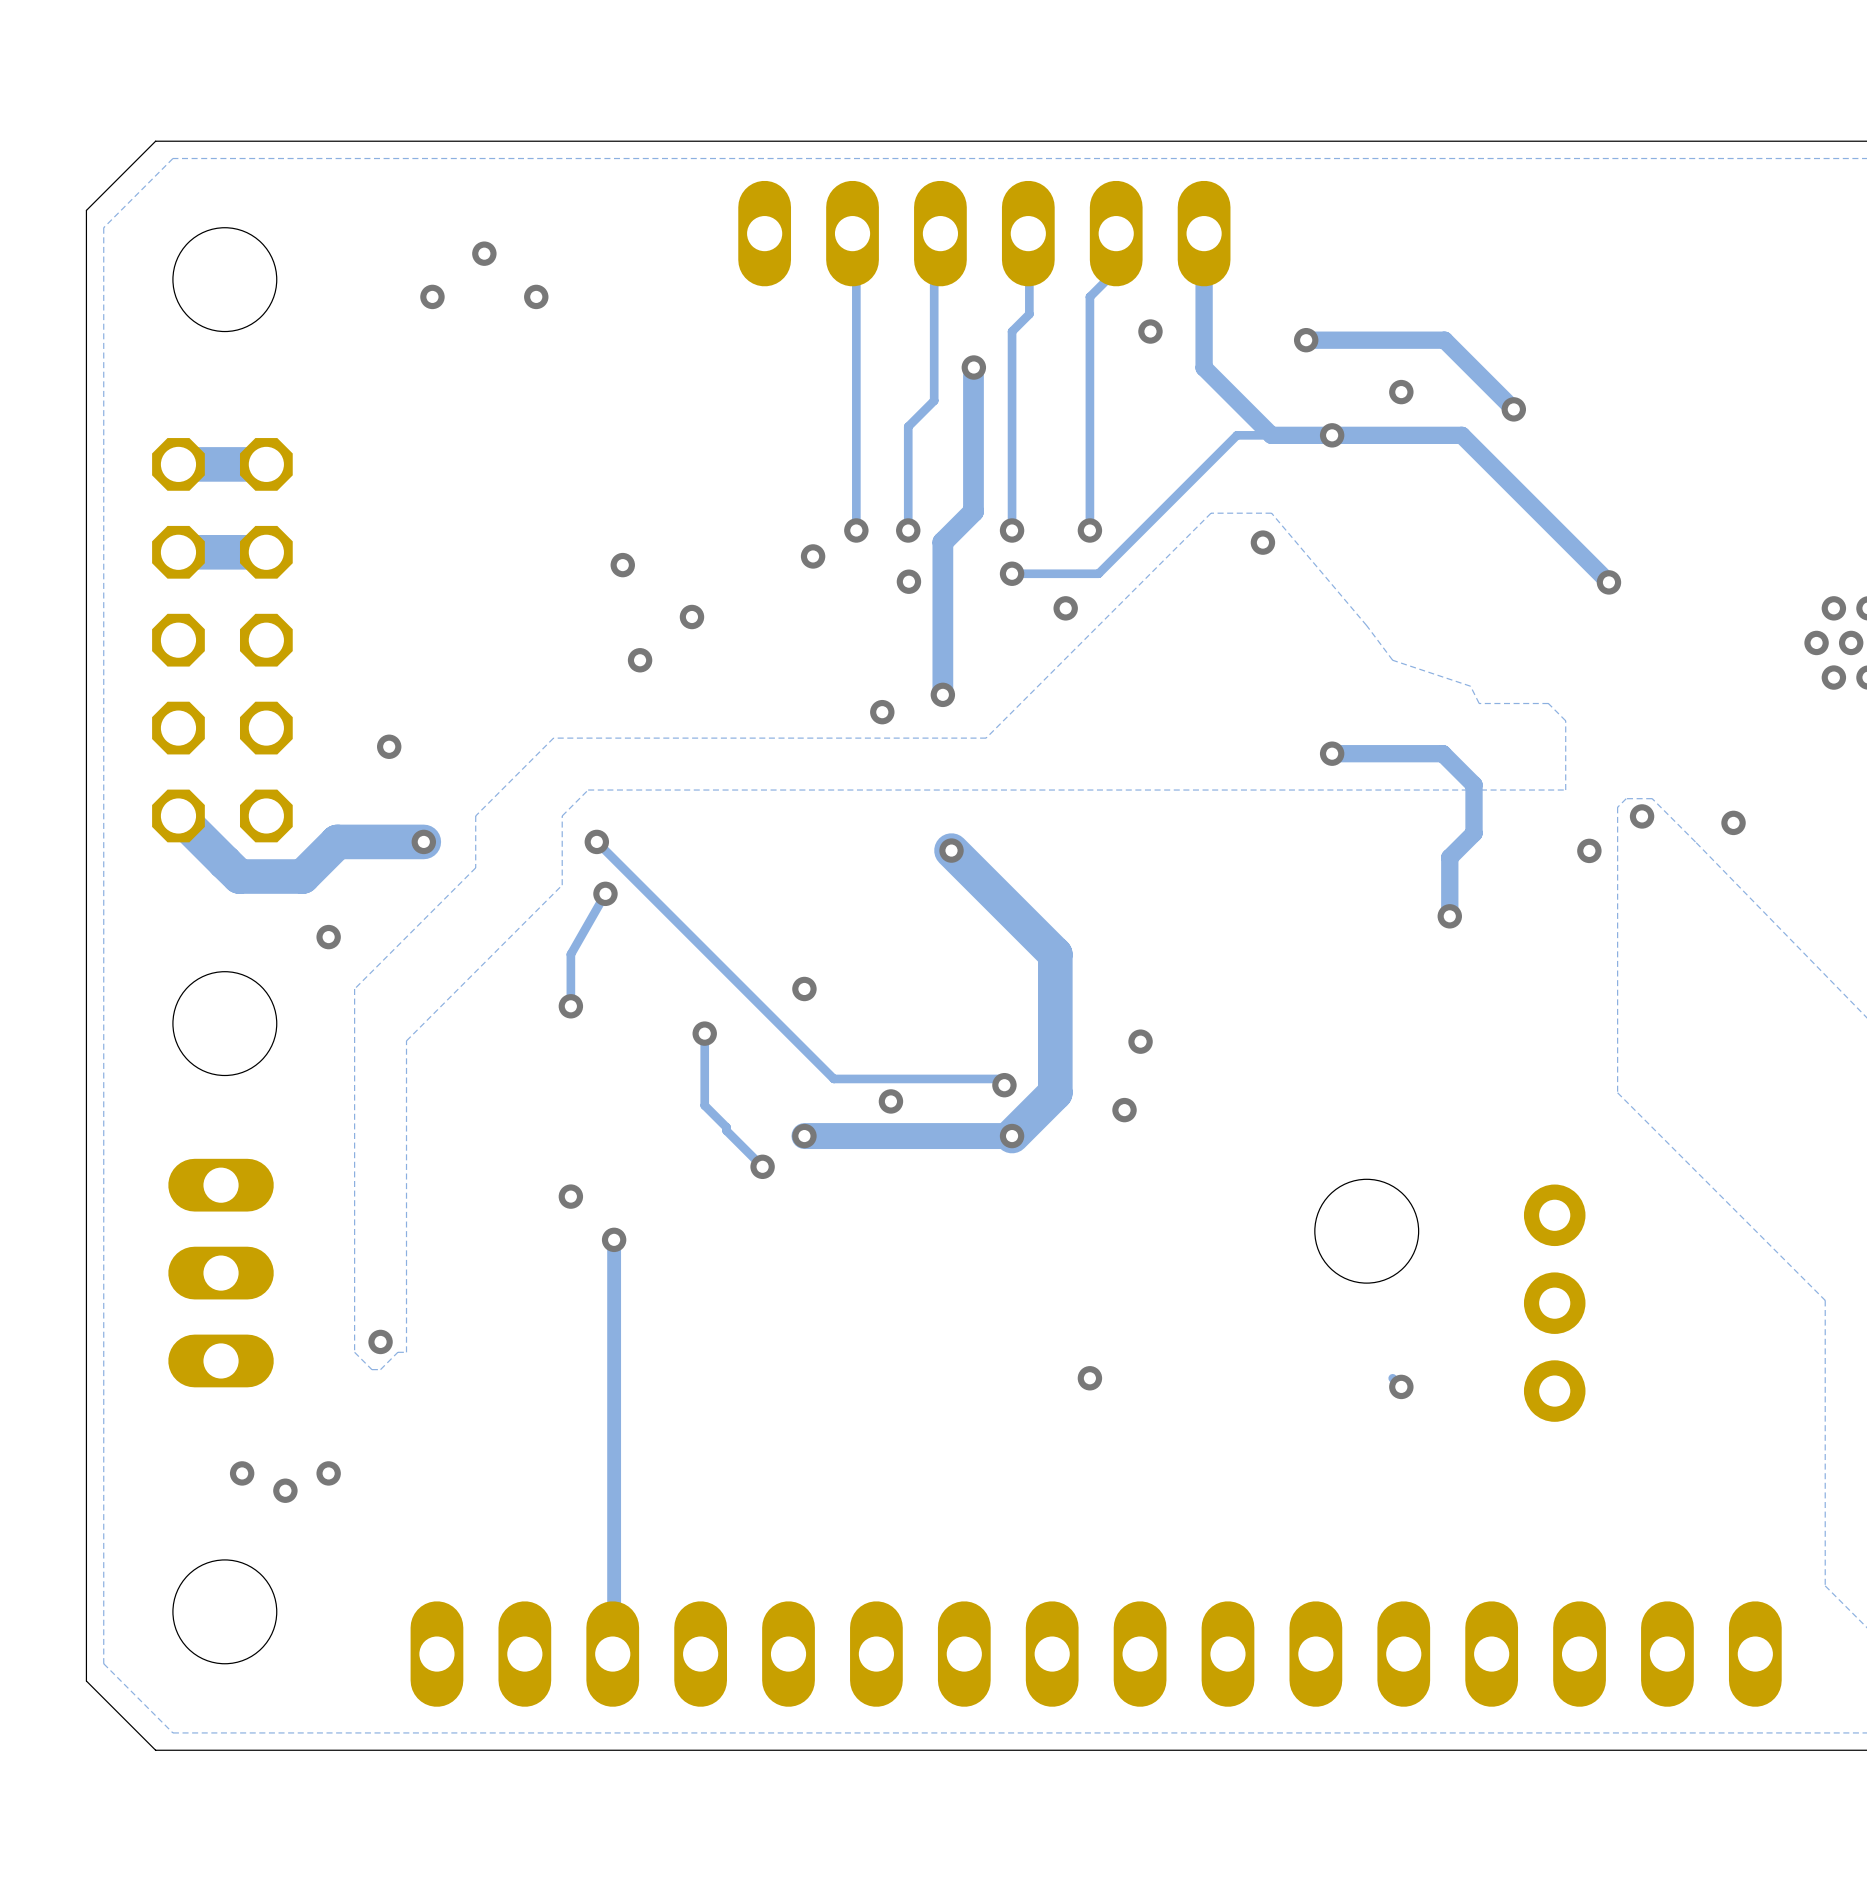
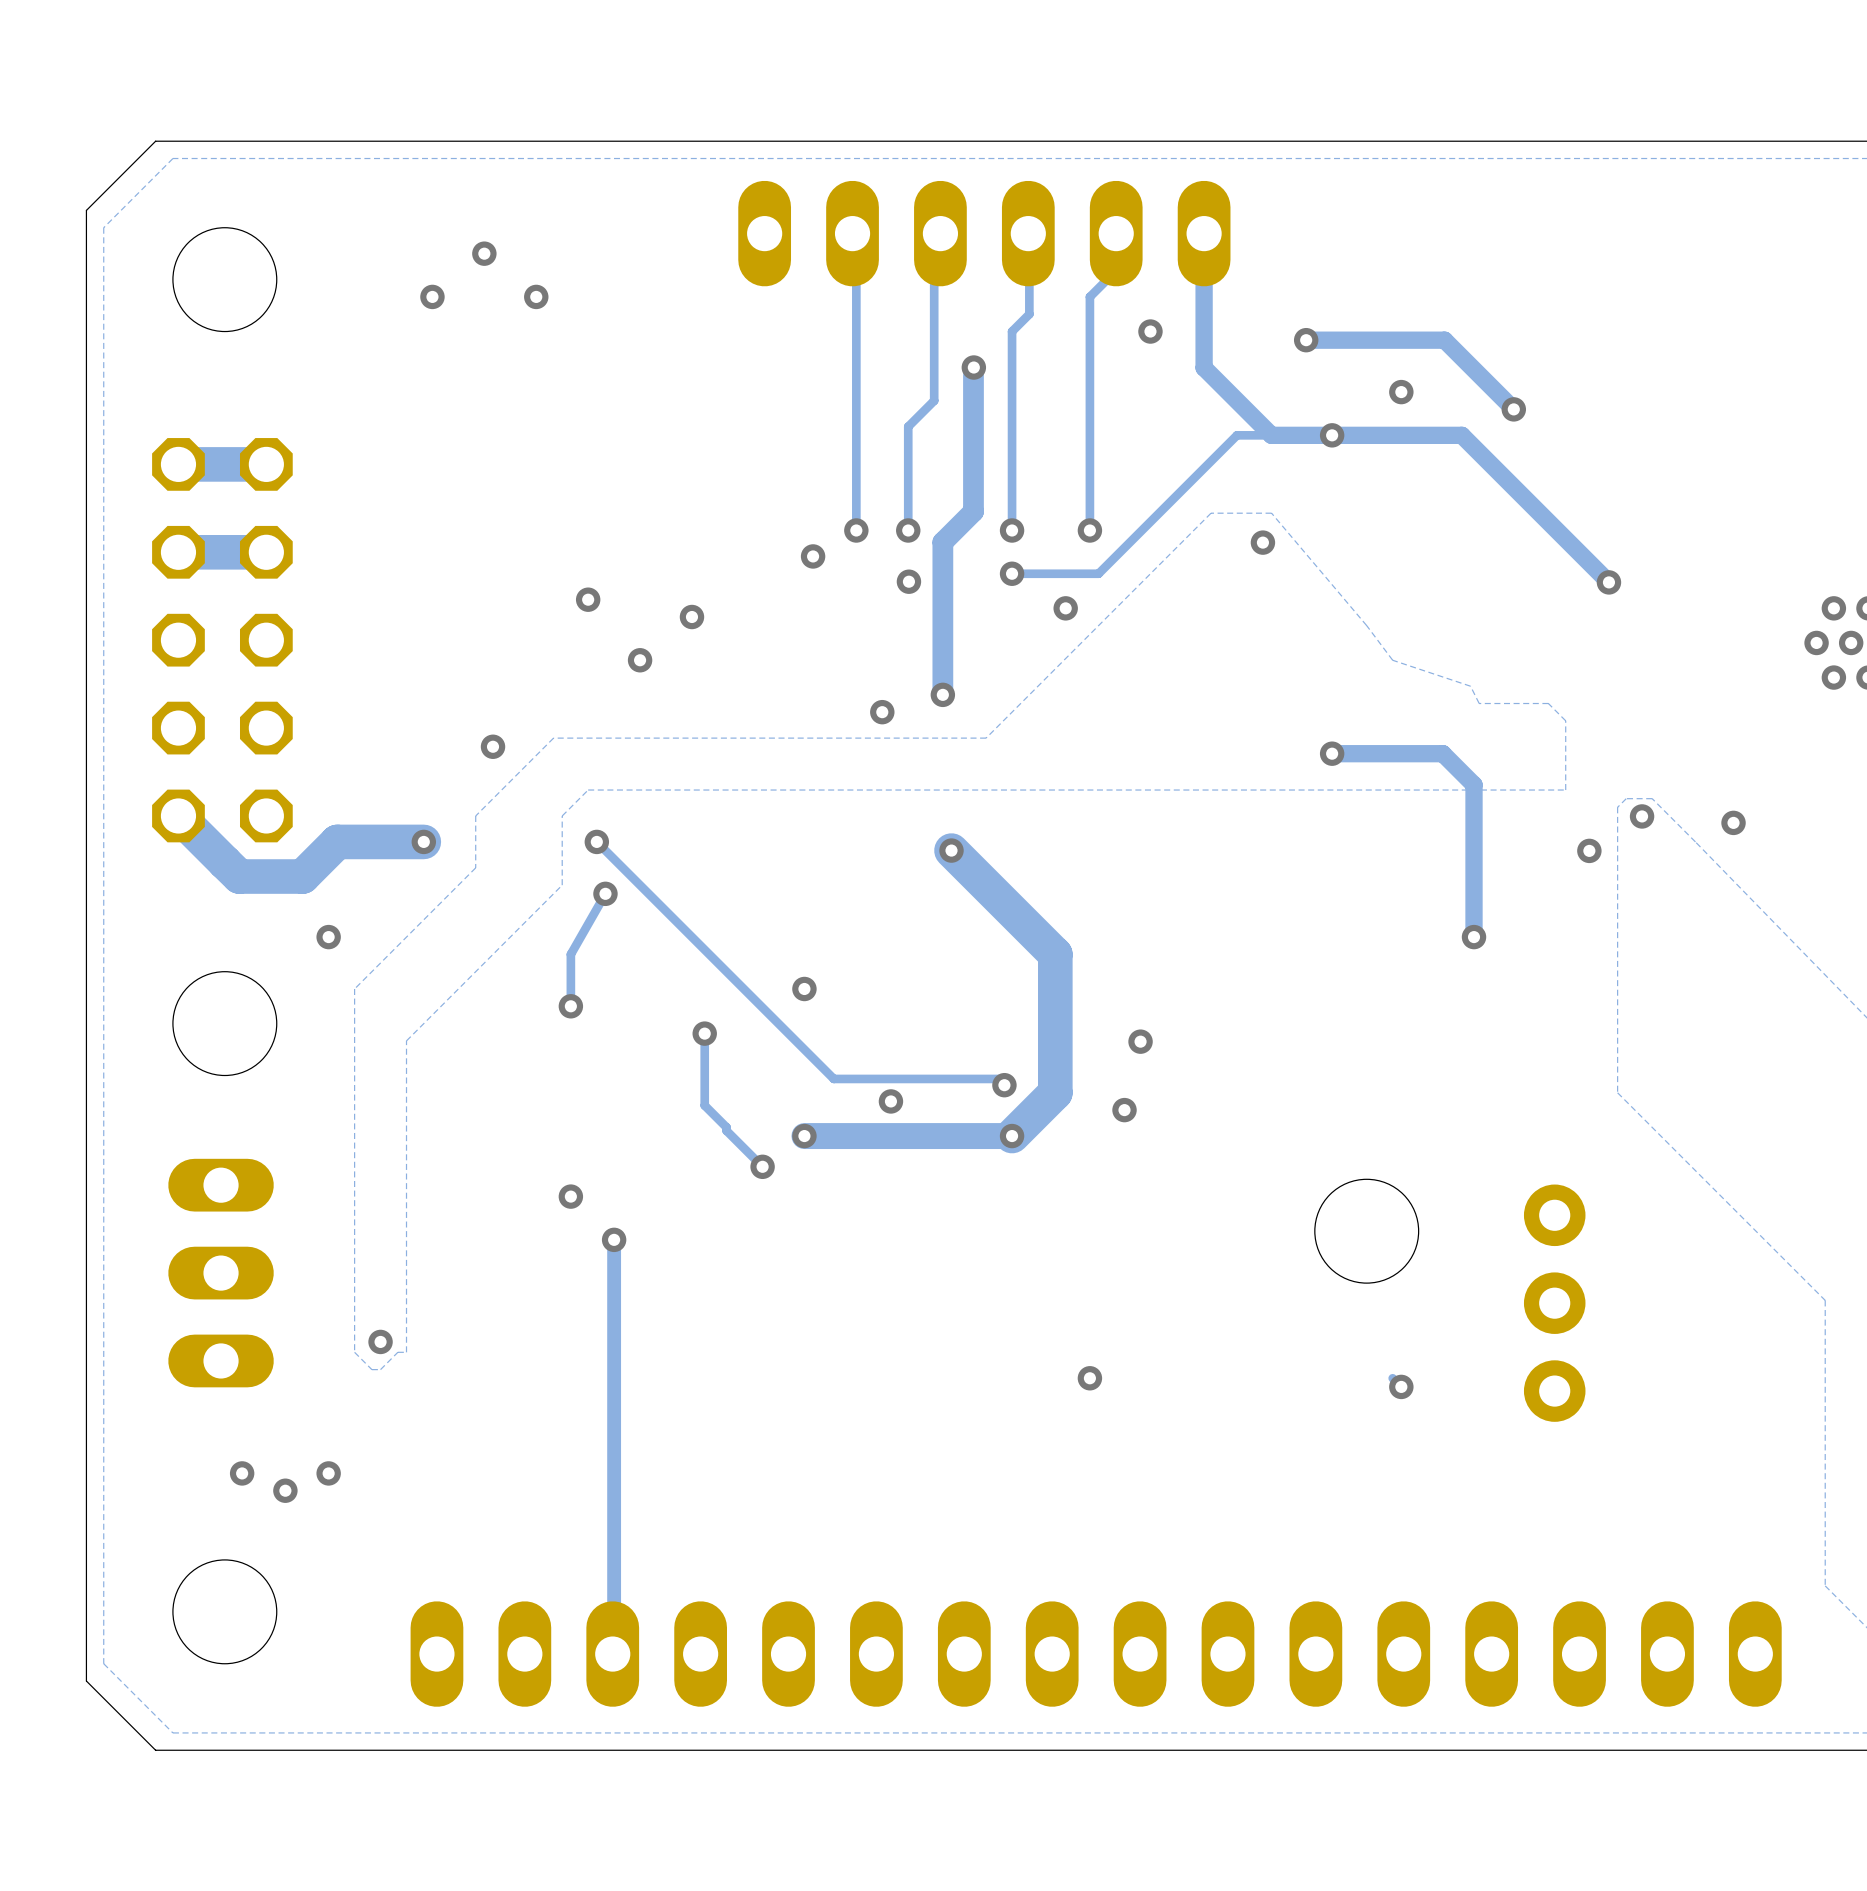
via position: (622, 565) -> (588, 599)
via position: (389, 746) -> (493, 746)
track: (1474, 833) (1449, 857) (1449, 916) -> (1474, 833) (1474, 937)
via position: (1449, 916) -> (1474, 937)

